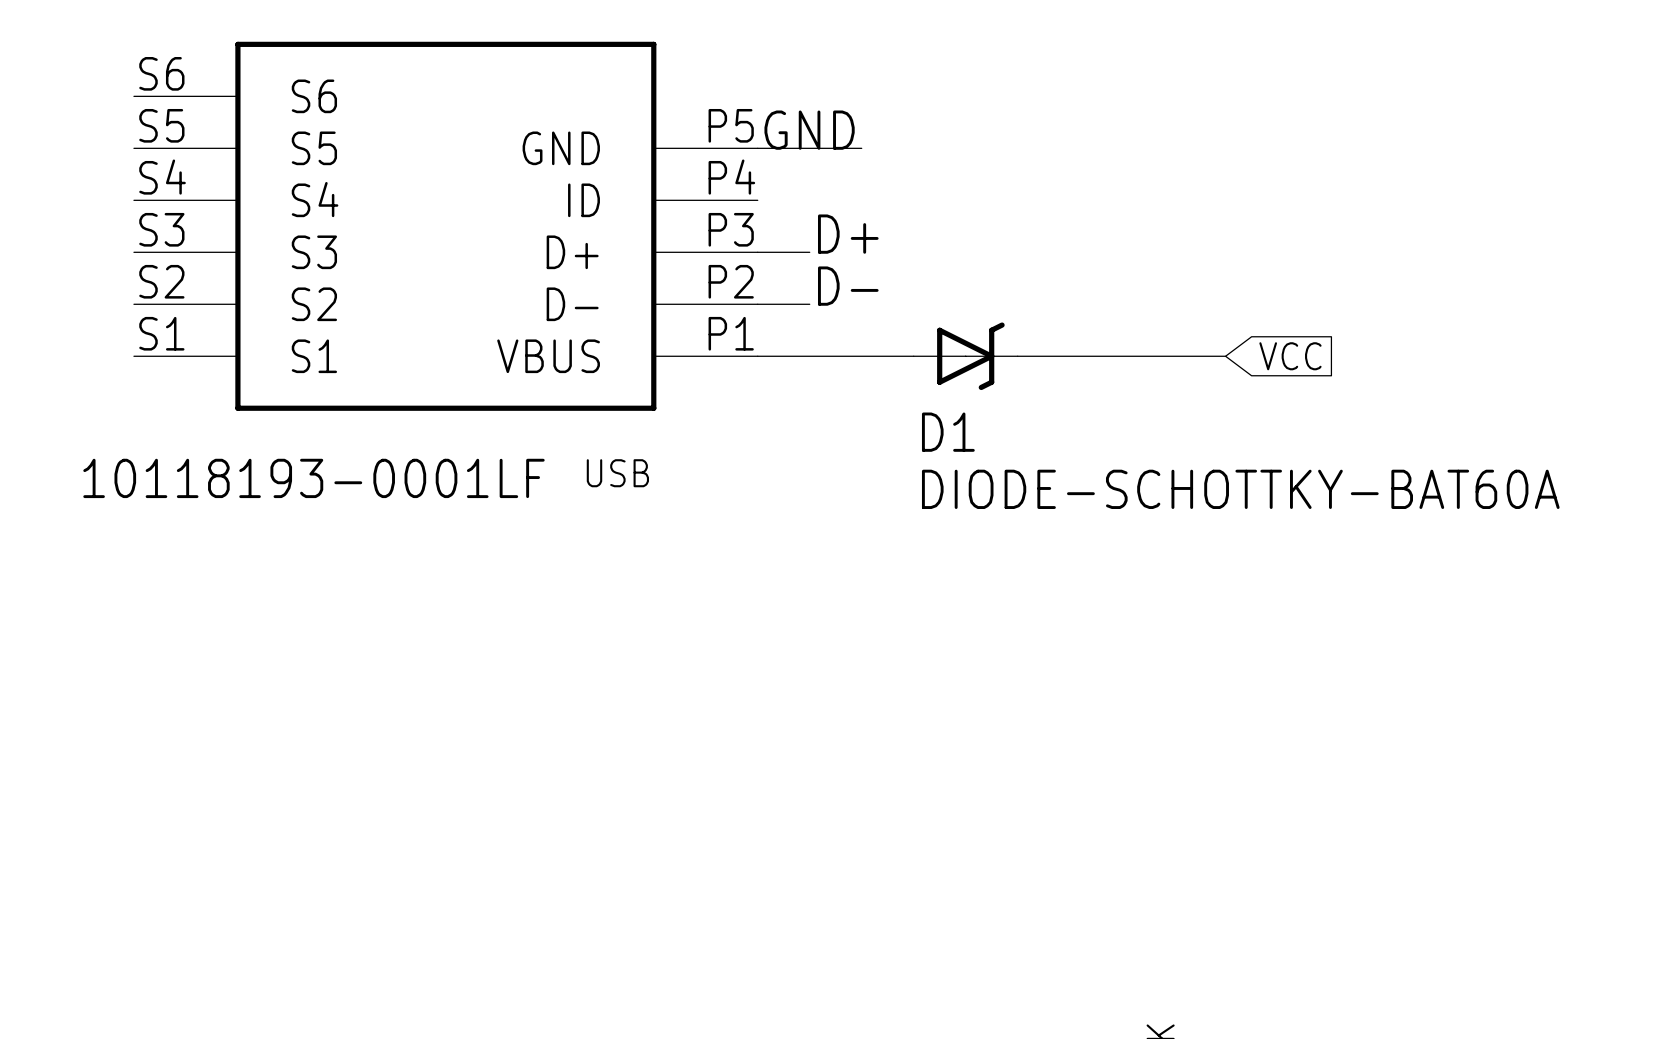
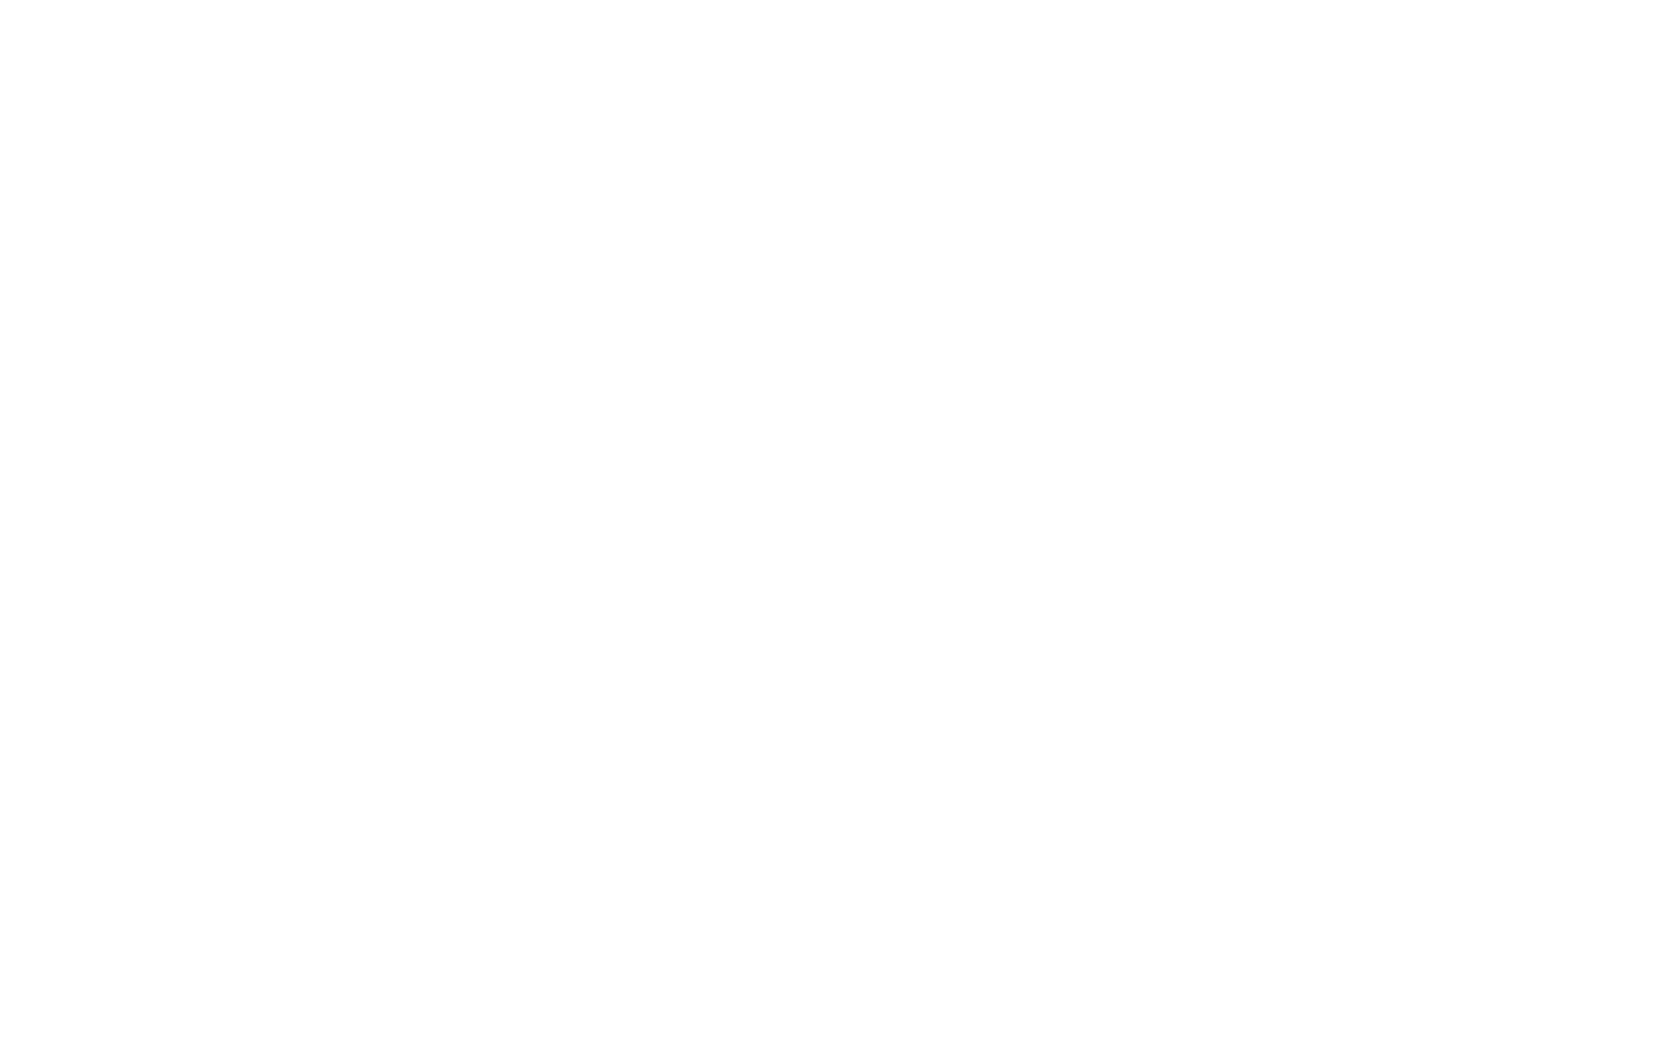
label: GND (809, 130) -> none
wire: (757, 148) (861, 148) -> none
part: (445, 226) -> none
label: D+ (848, 234) -> none
wire: (757, 252) (809, 252) -> none
label: D- (848, 286) -> none
wire: (757, 304) (809, 304) -> none
wire: (757, 356) (913, 356) -> none
D1: DIODE-SCHOTTKY-BAT60A (965, 356) -> none
wire: (1017, 356) (1225, 356) -> none
global label: VCC (1290, 356) -> none

